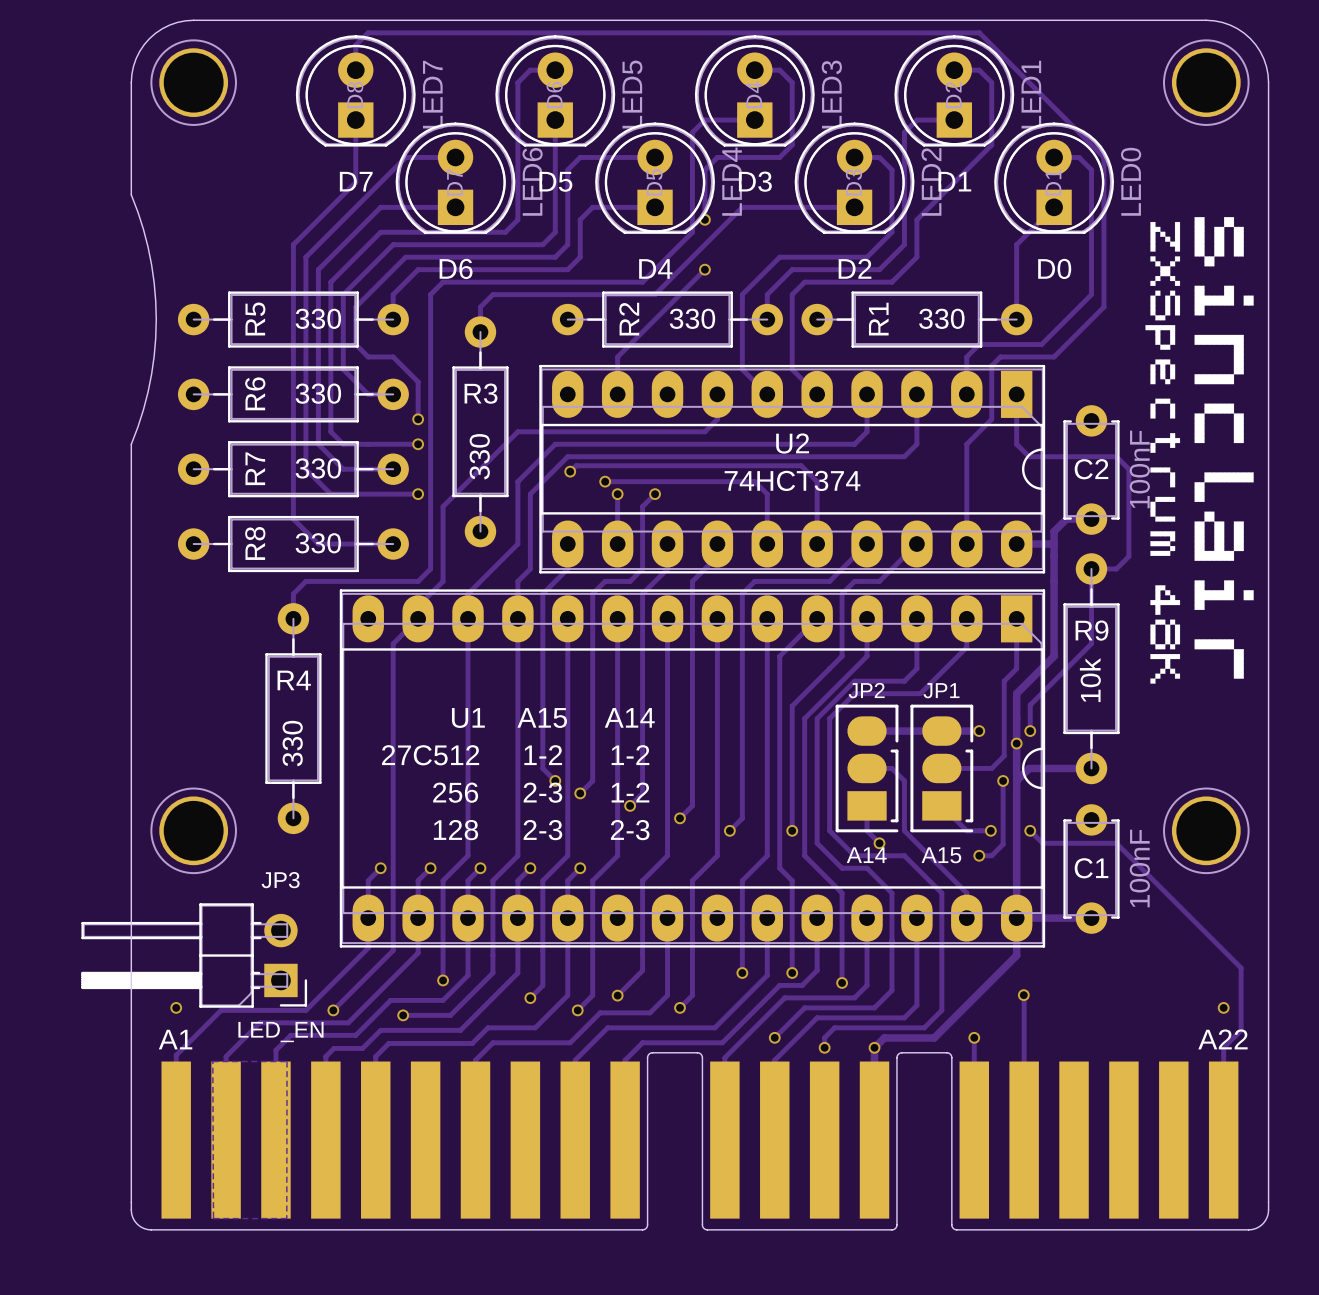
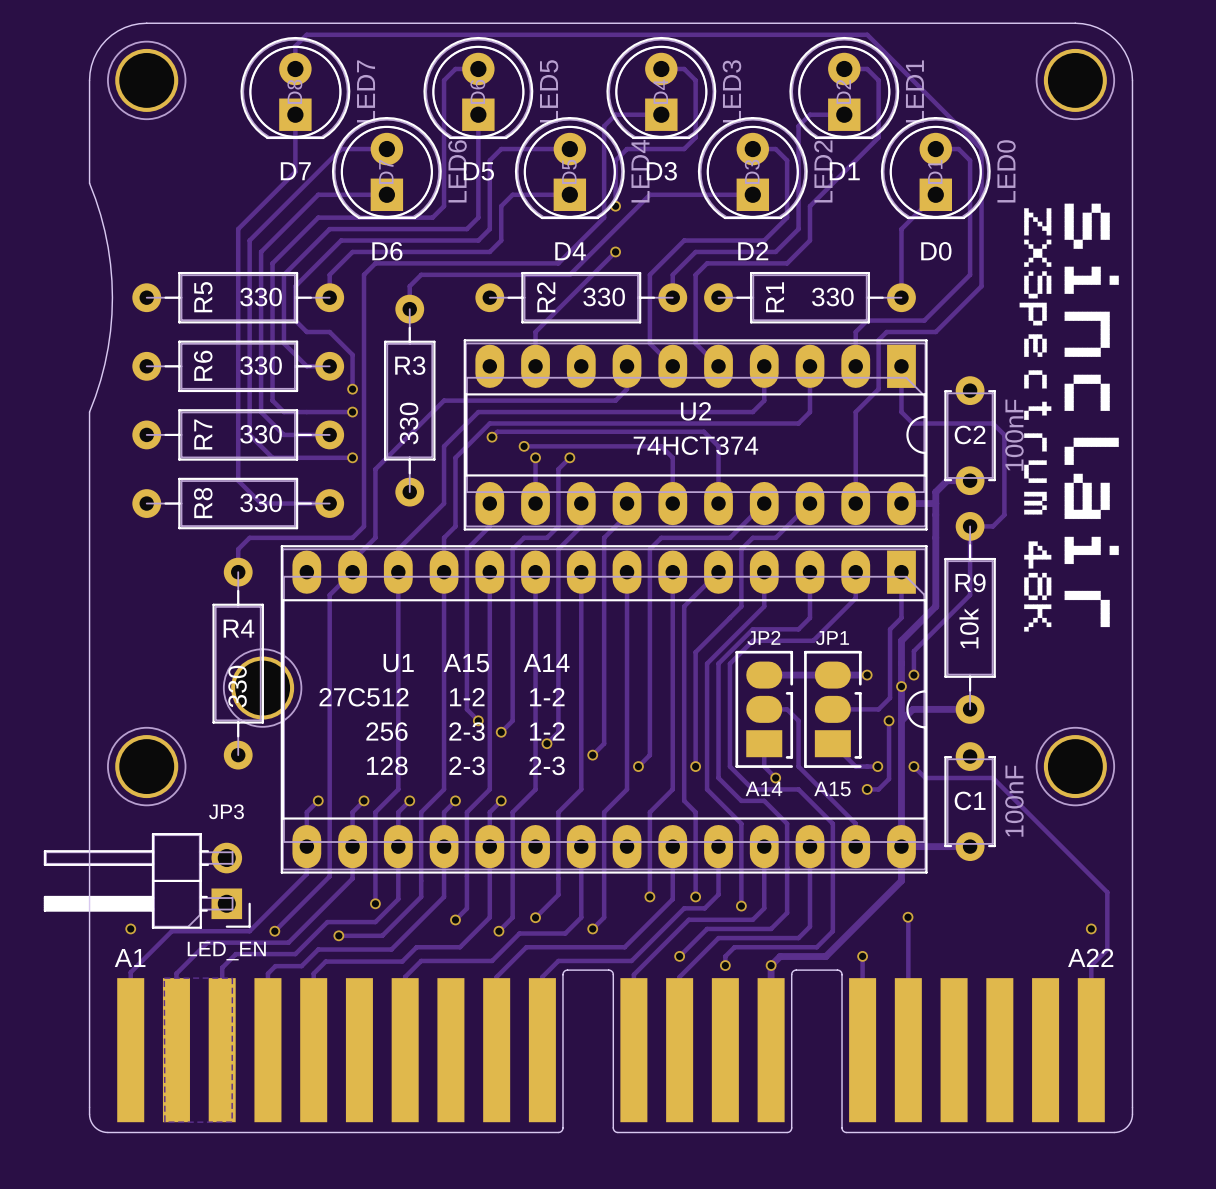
part: none -> (262, 688)

